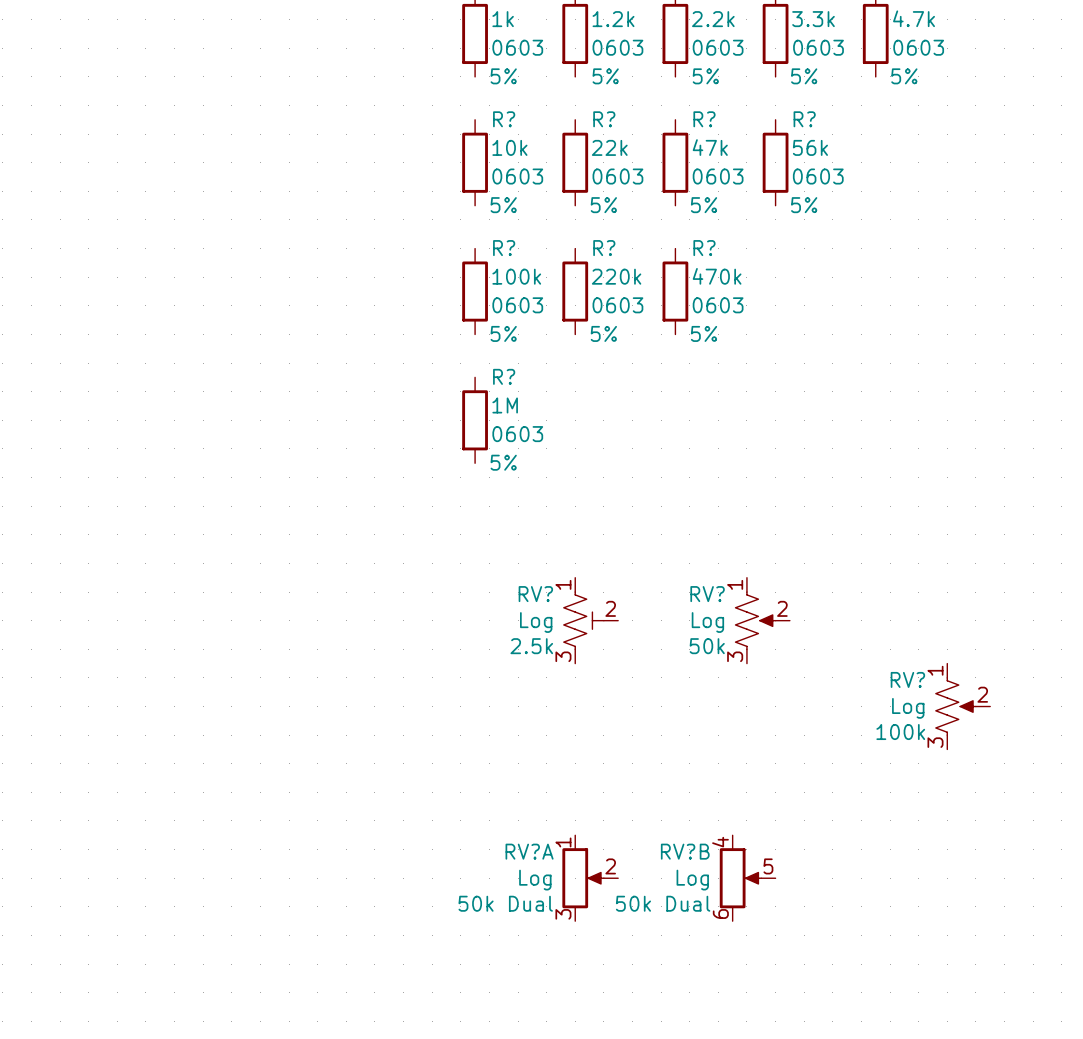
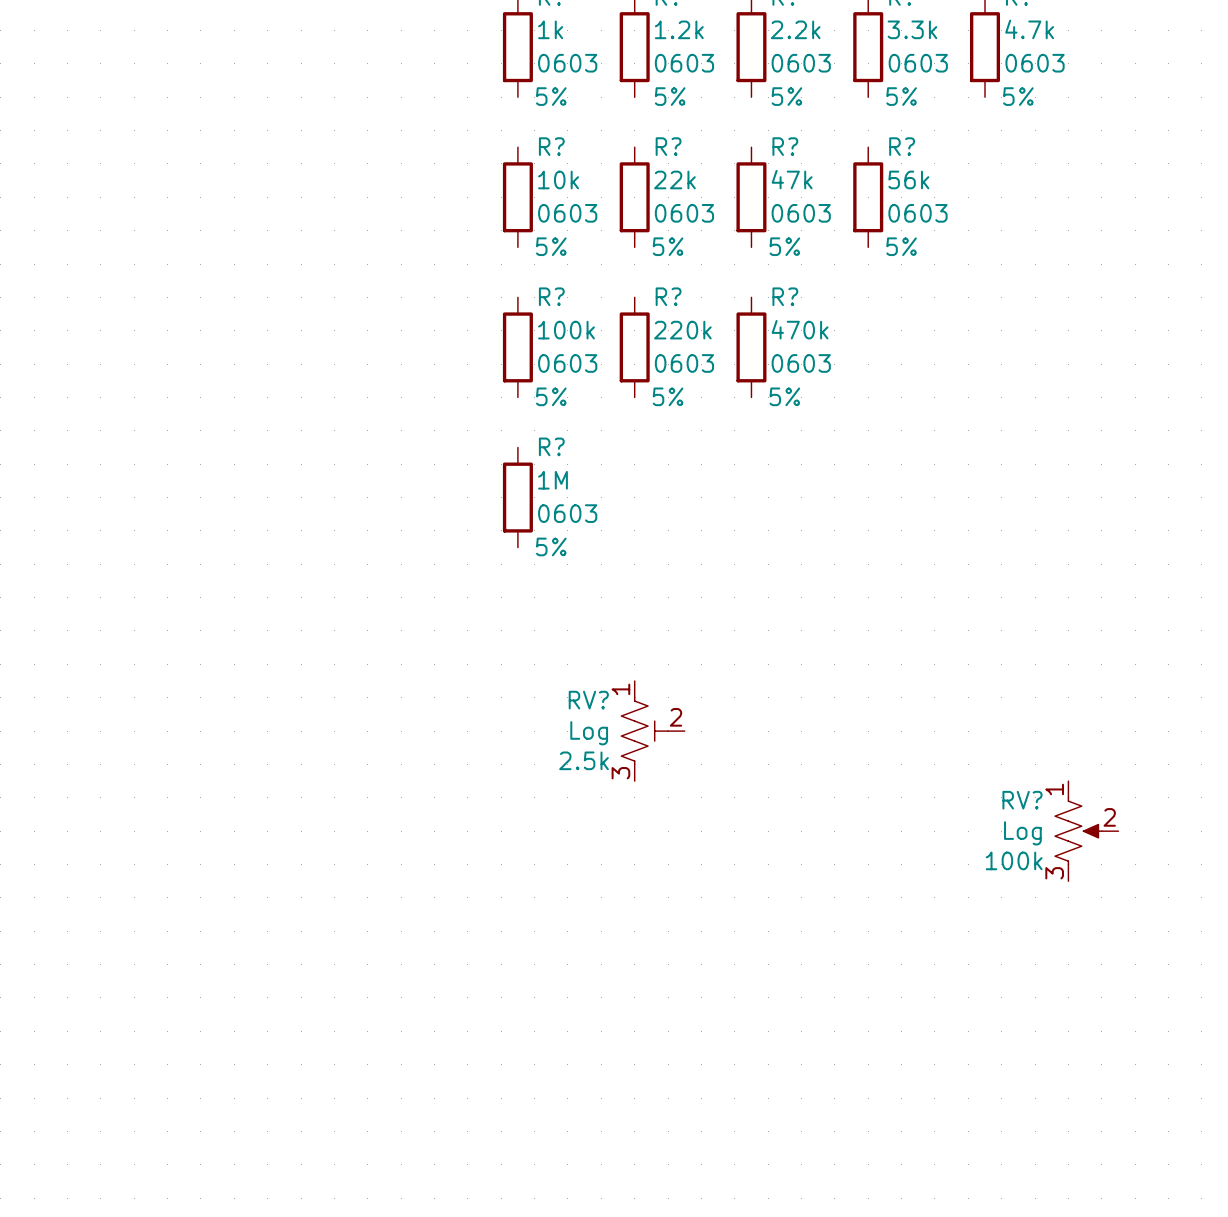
RV?: (762, 620) -> none
RV?A: (590, 878) -> none
RV?B: (747, 878) -> none

